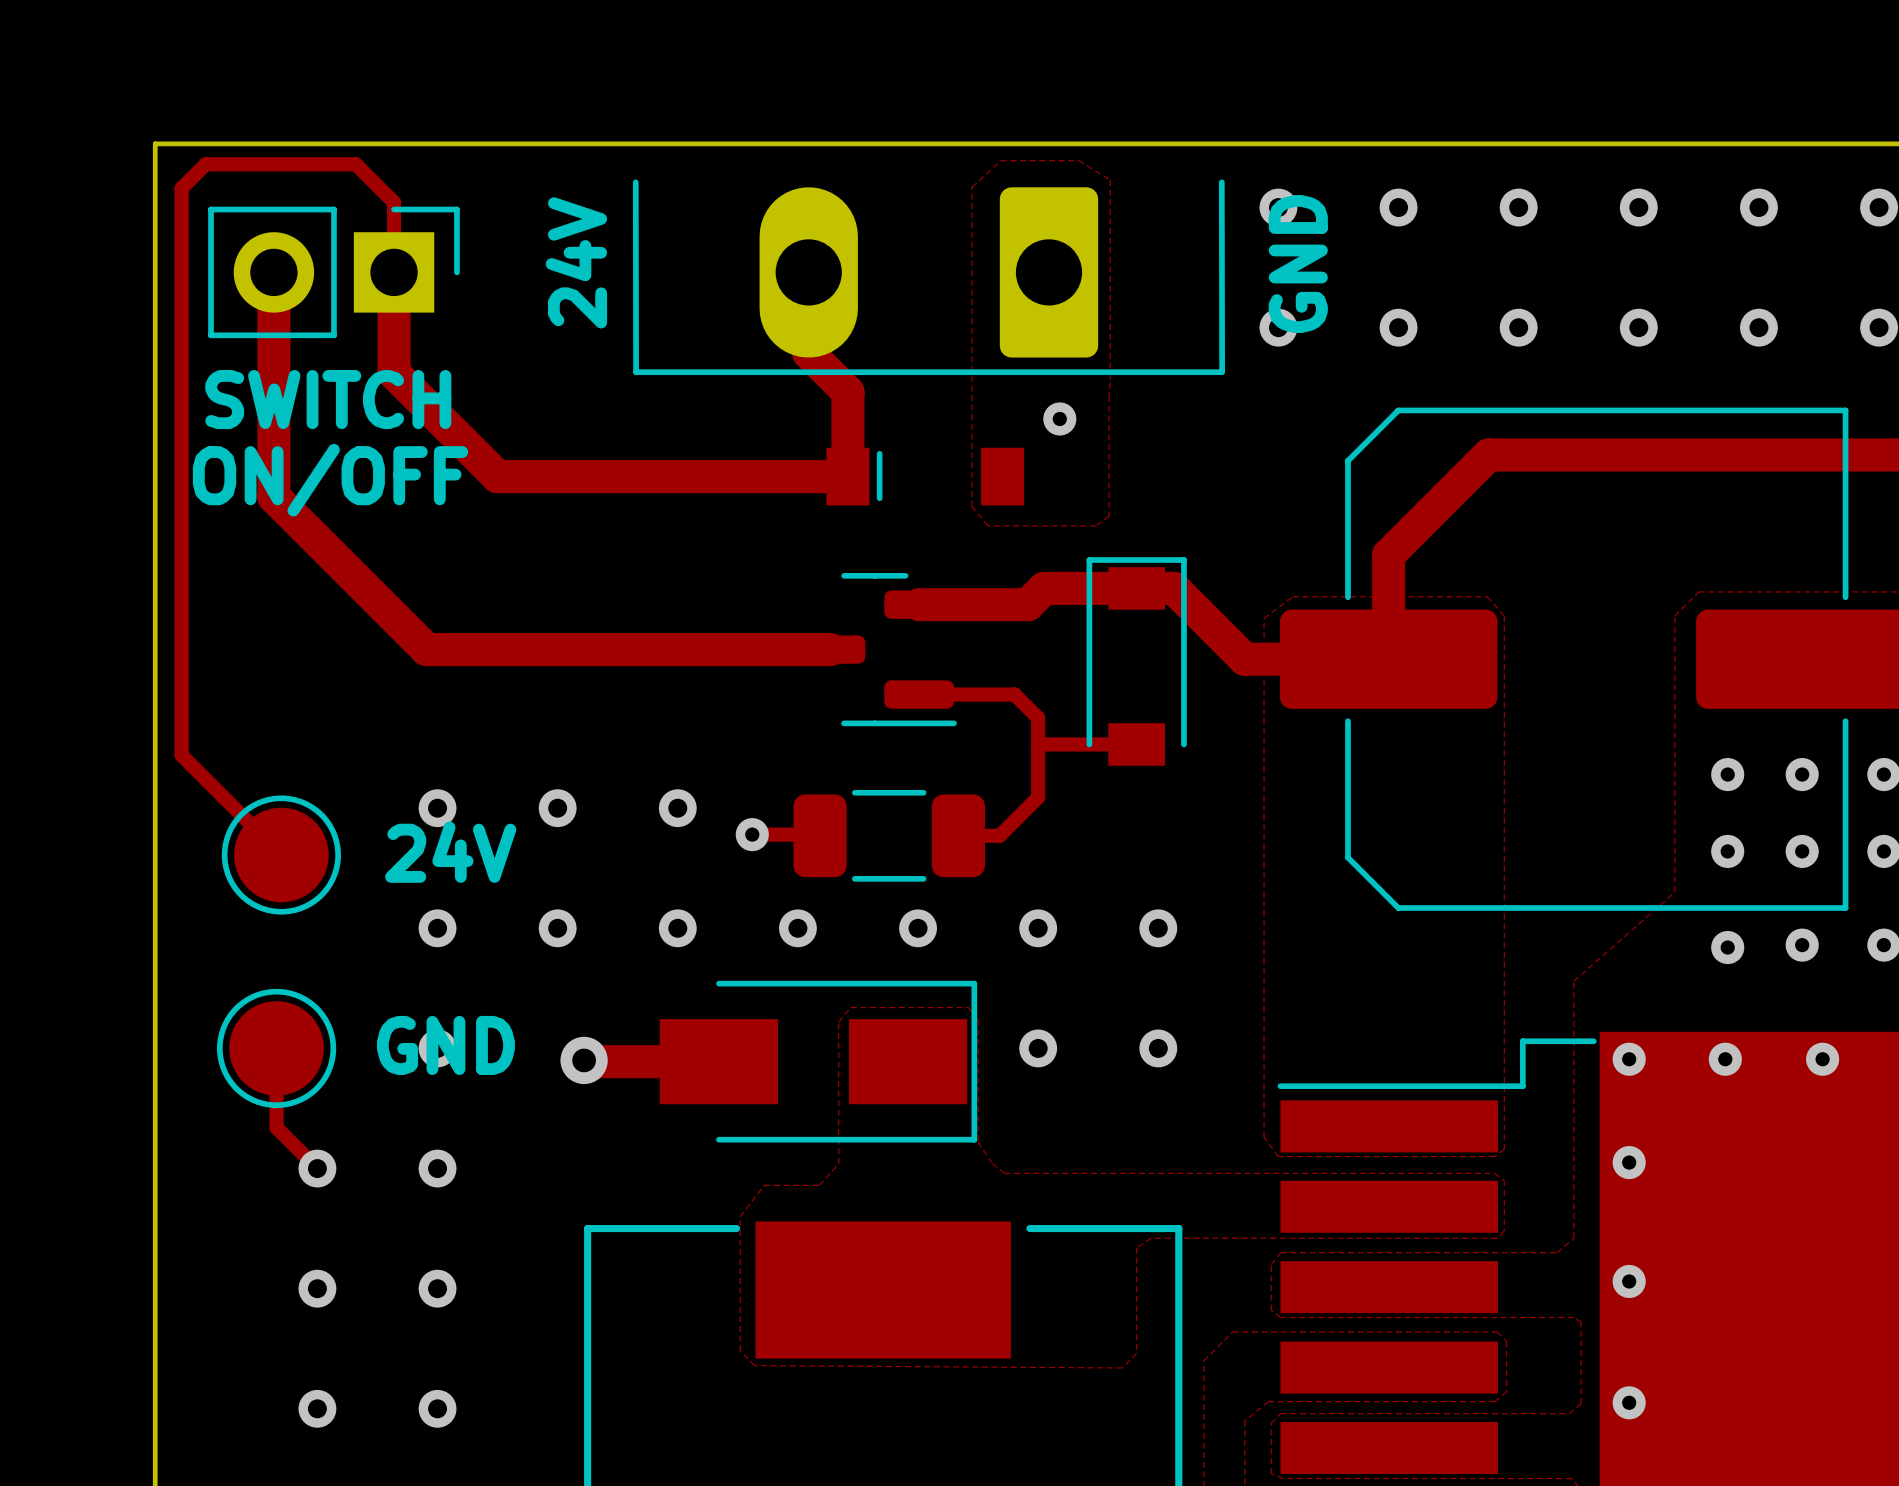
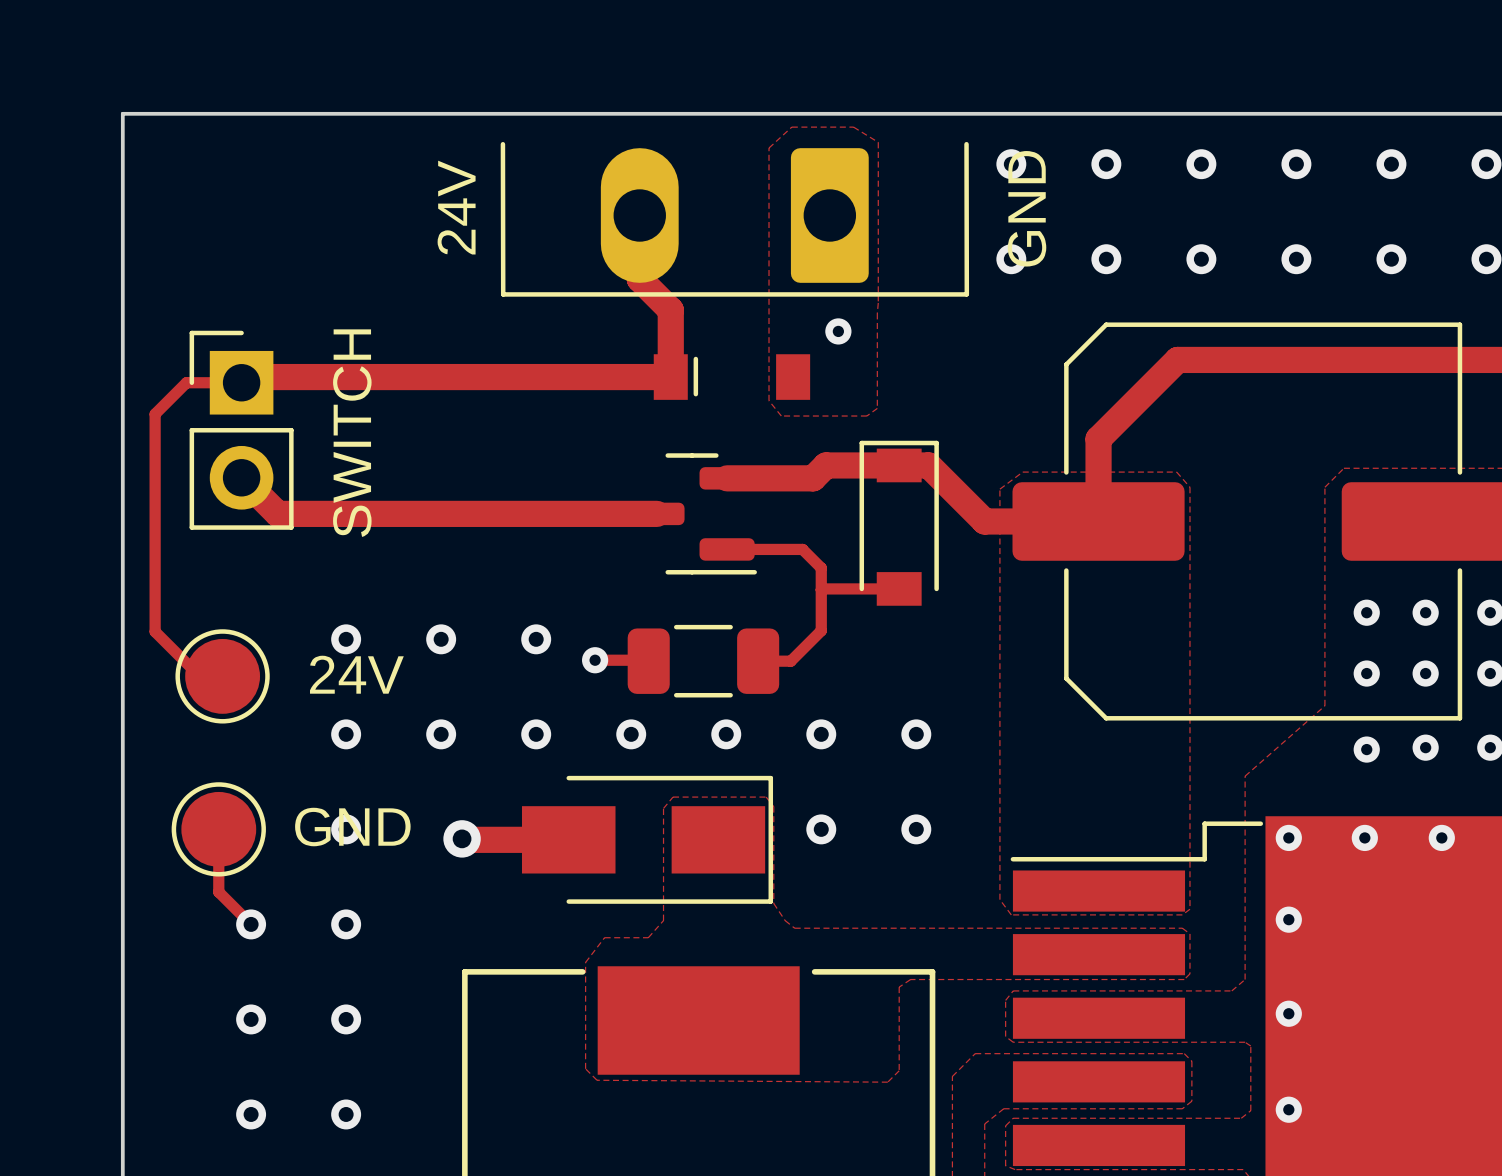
top track: (273, 272) (273, 496) (426, 649) -> (241, 477) (277, 513) (337, 513)
part rotation: 0° (333, 272) -> 90° counterclockwise (241, 430)
part position: (333, 272) -> (241, 430)
text rotation: 0° (328, 399) -> 90° counterclockwise (352, 433)
top track: (497, 476) (394, 373) (394, 202) (355, 164) (205, 164) (181, 188) (181, 755) (281, 855) -> (393, 377) (247, 377) (241, 382) (186, 382) (155, 414) (155, 631) (199, 676) (222, 676)
text: ON/OFF (330, 480) -> none

